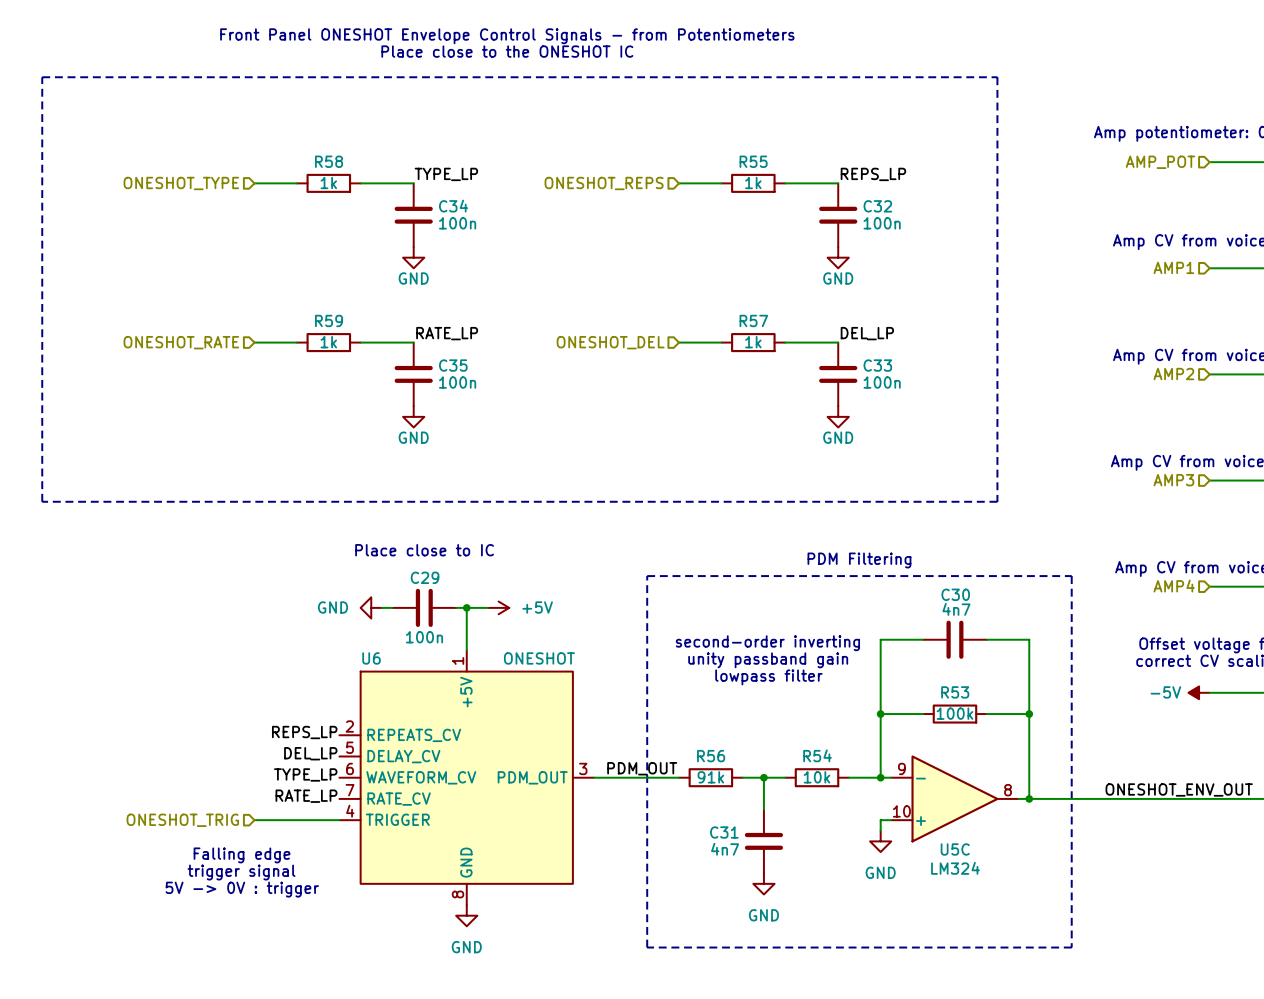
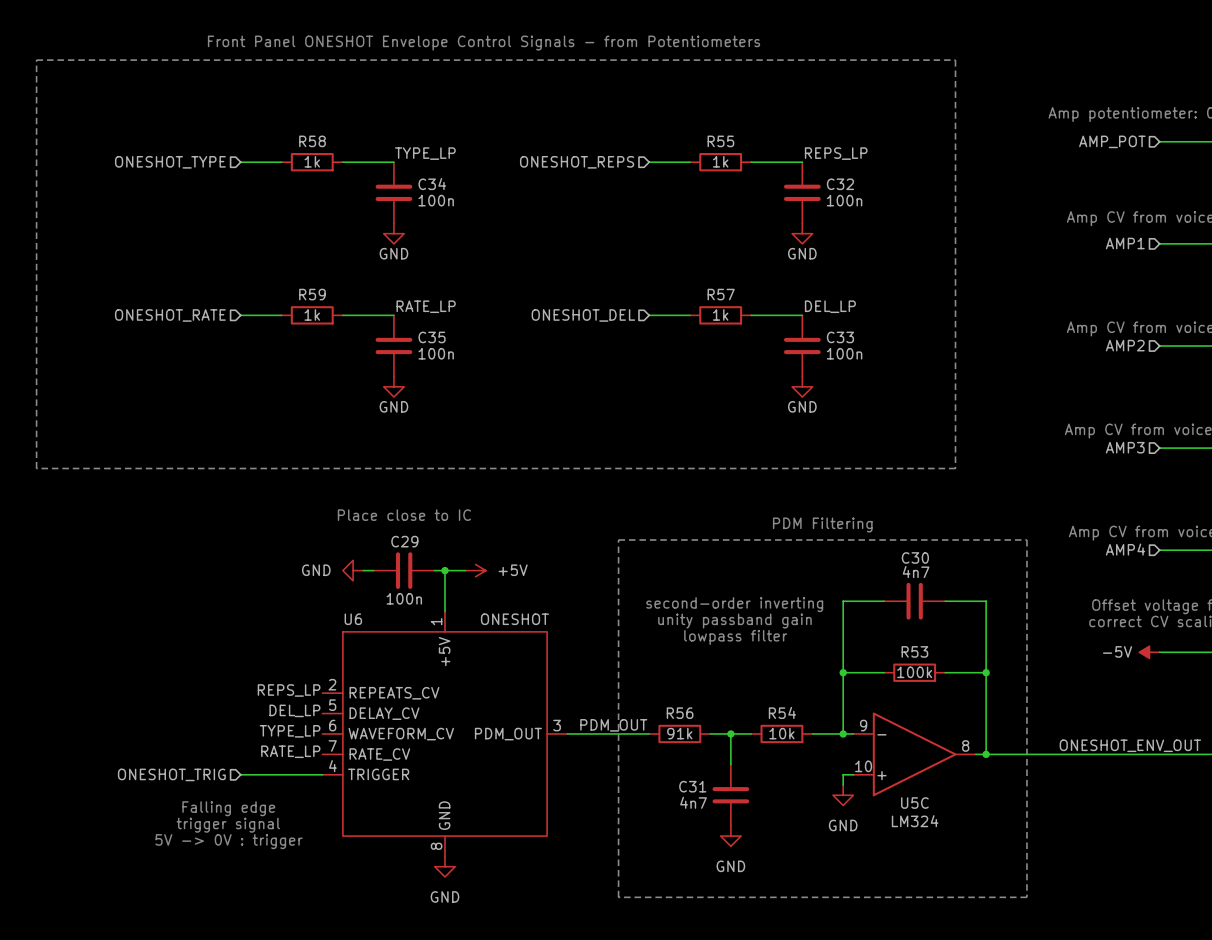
text: Front Panel ONESHOT Envelope Control Signals - from Potentiometers (507, 36) -> none
text: Place close to the ONESHOT IC (507, 51) -> Front Panel ONESHOT Envelope Control Signals - from Potentiometers (484, 43)

